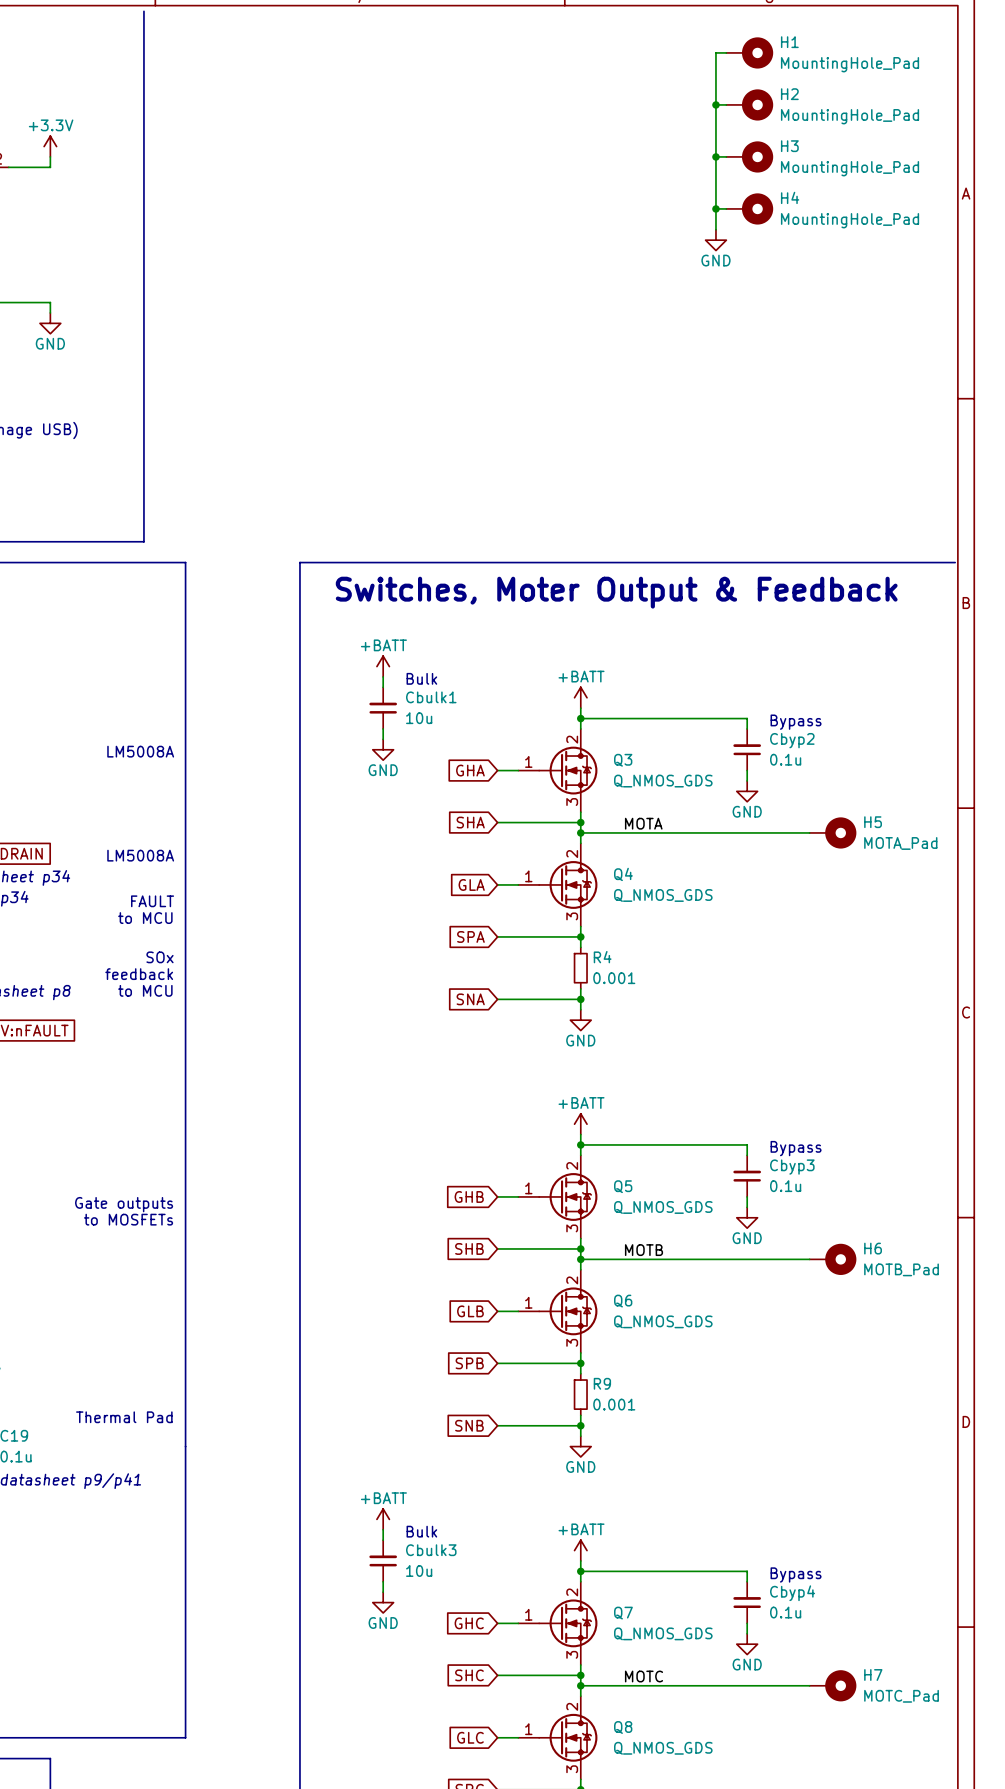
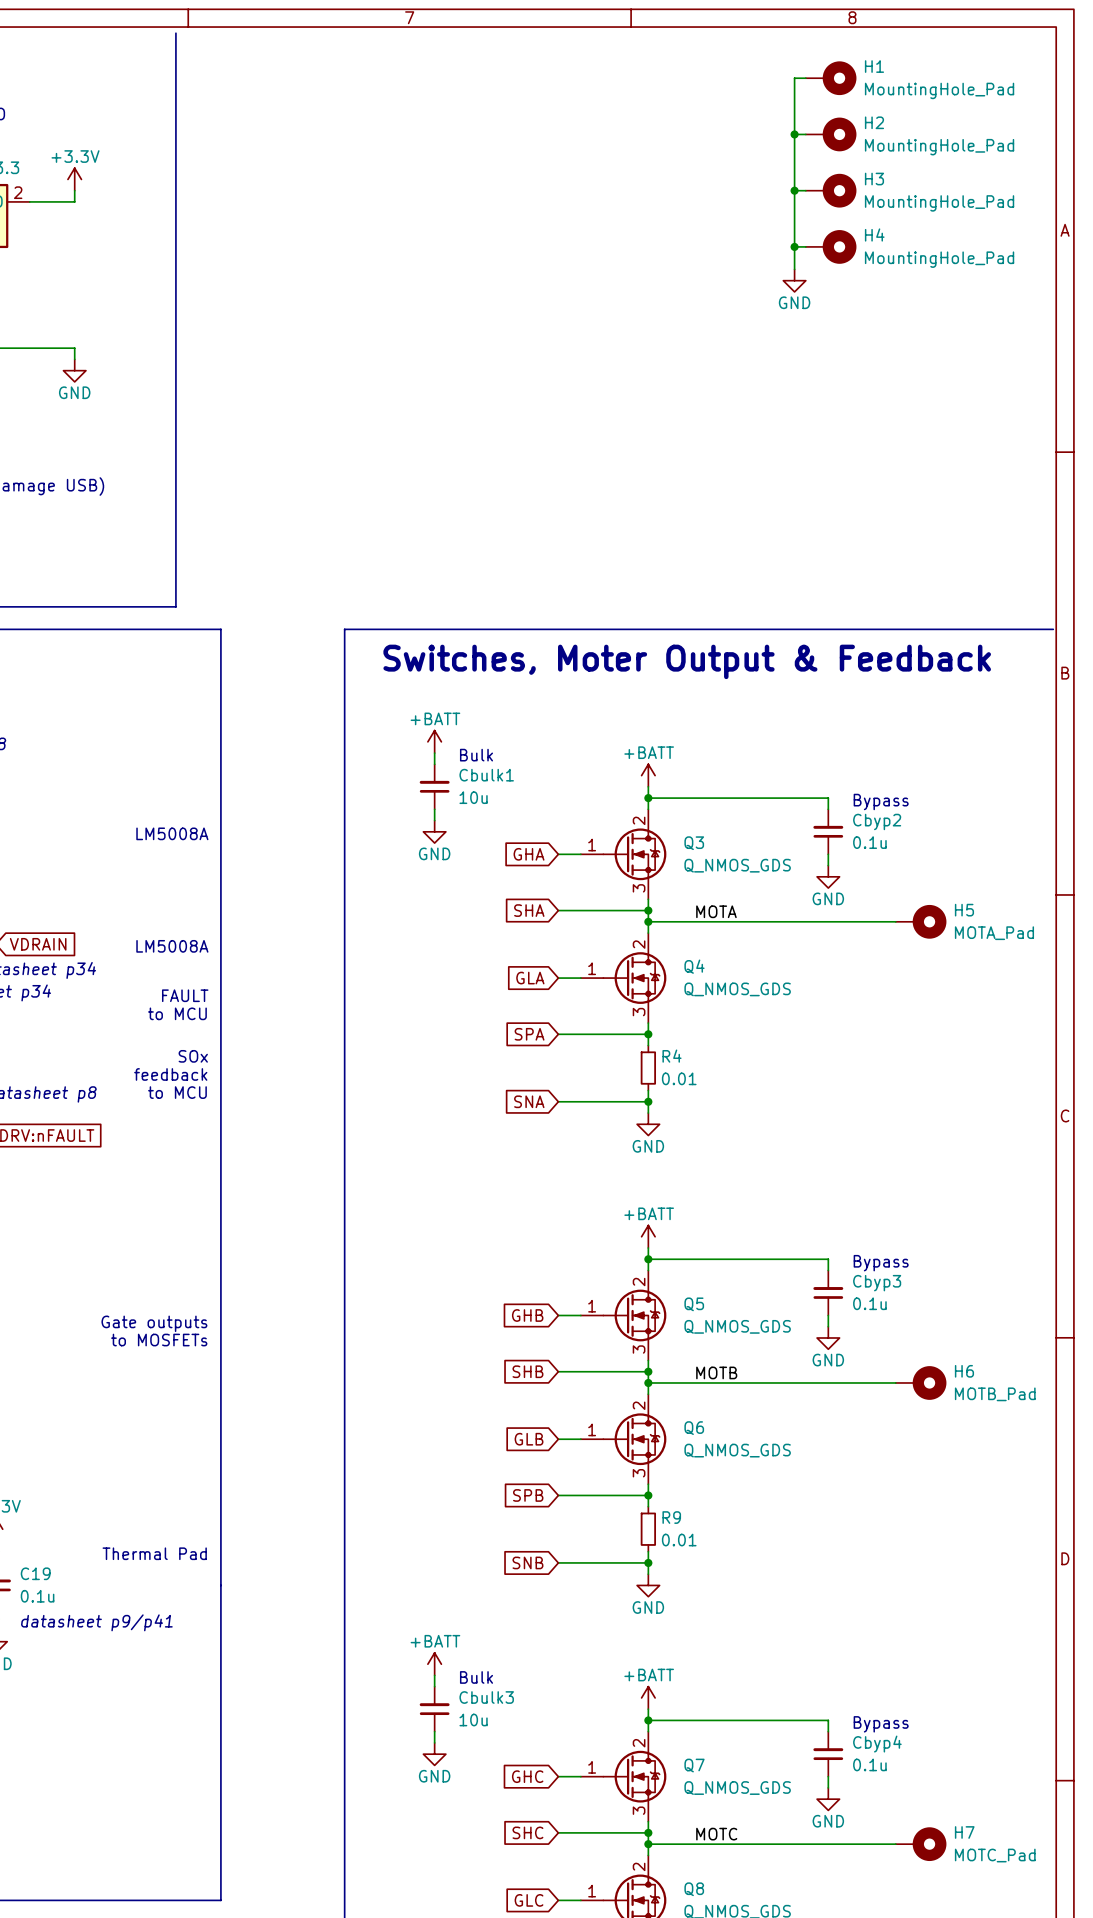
R4 value: 0.001 (614, 978) -> 0.01 (679, 1078)
R9 value: 0.001 (614, 1404) -> 0.01 (679, 1540)

